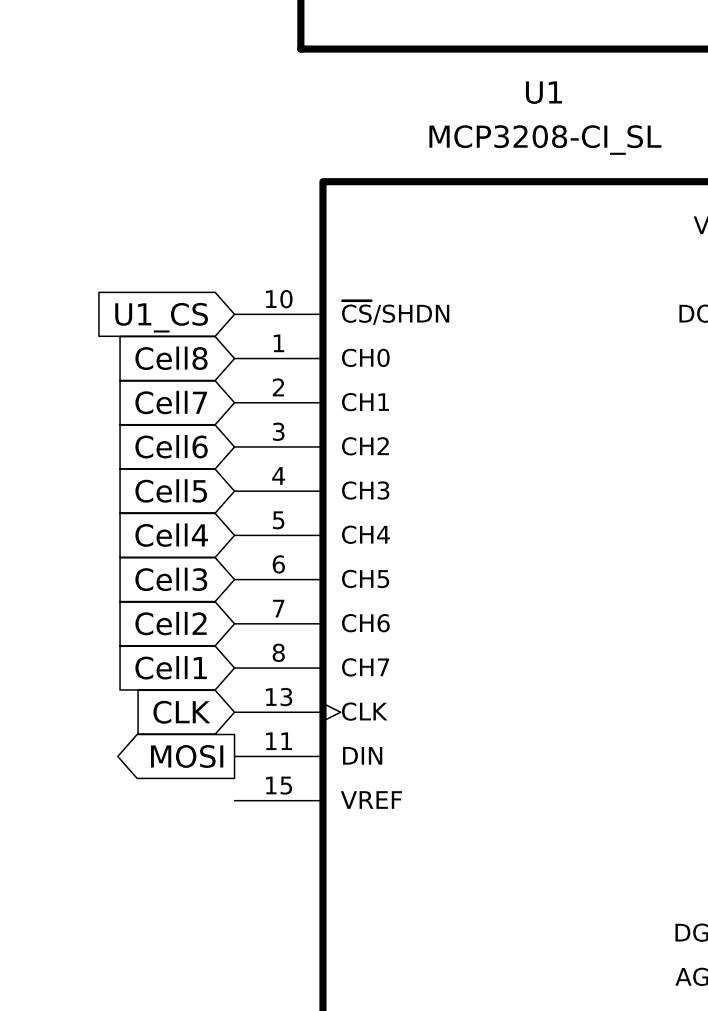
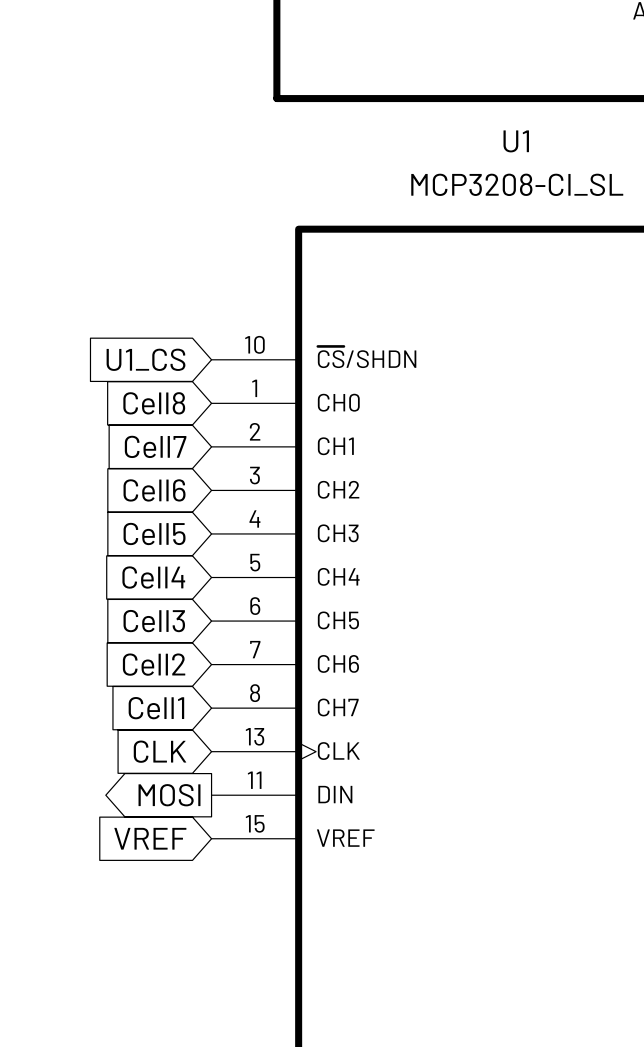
global label: none -> VREF (150, 838)

